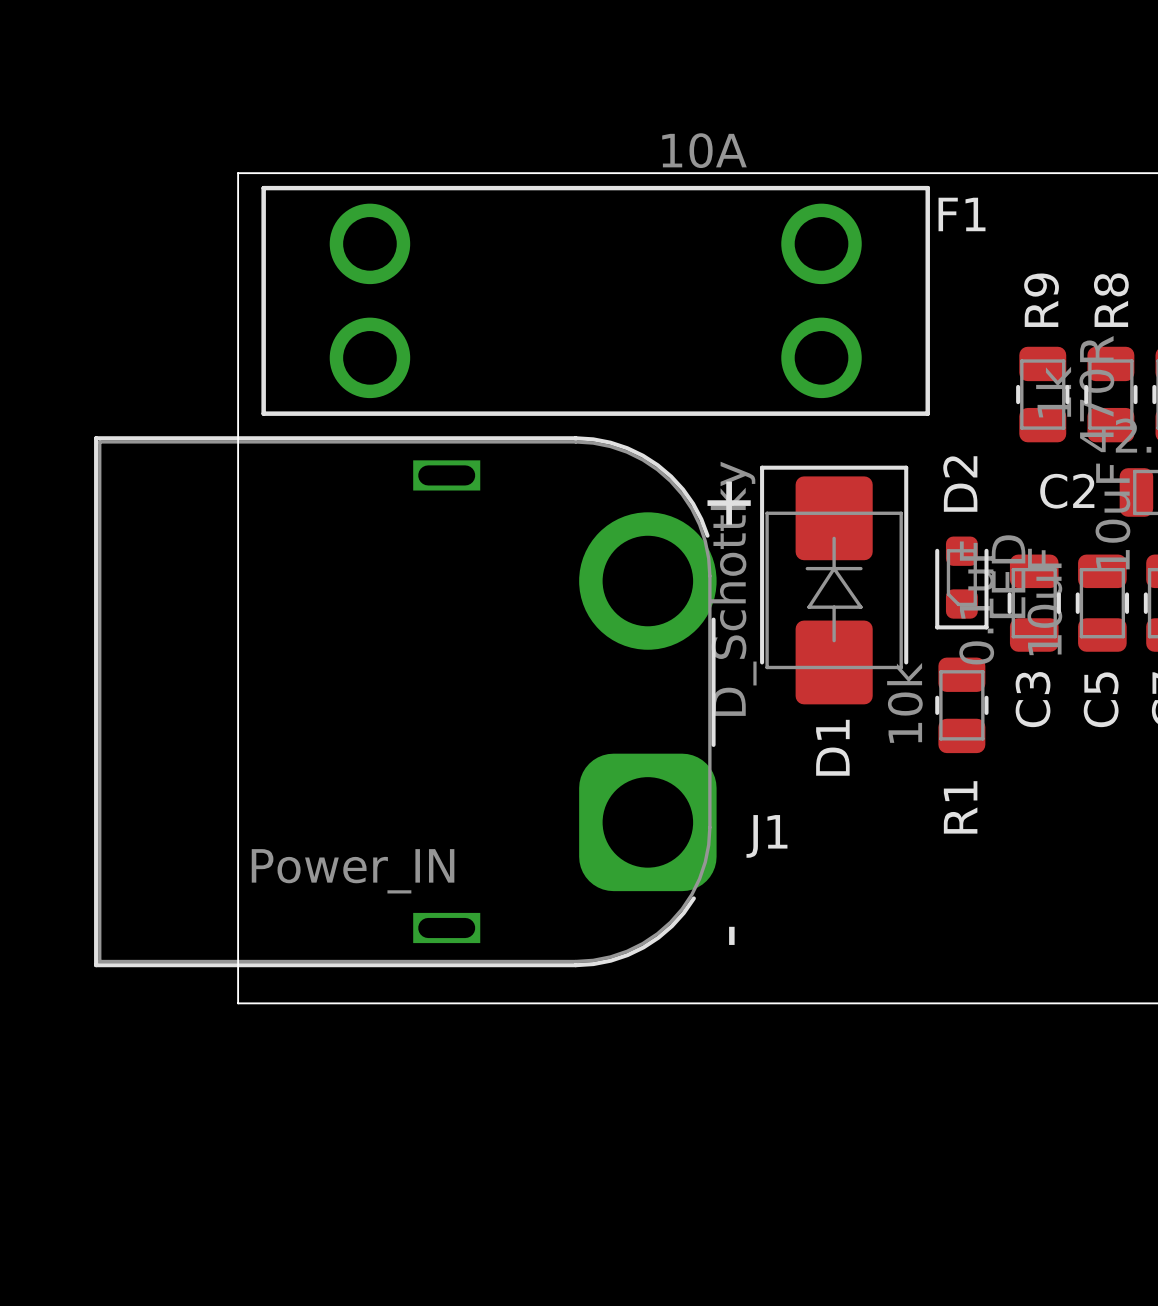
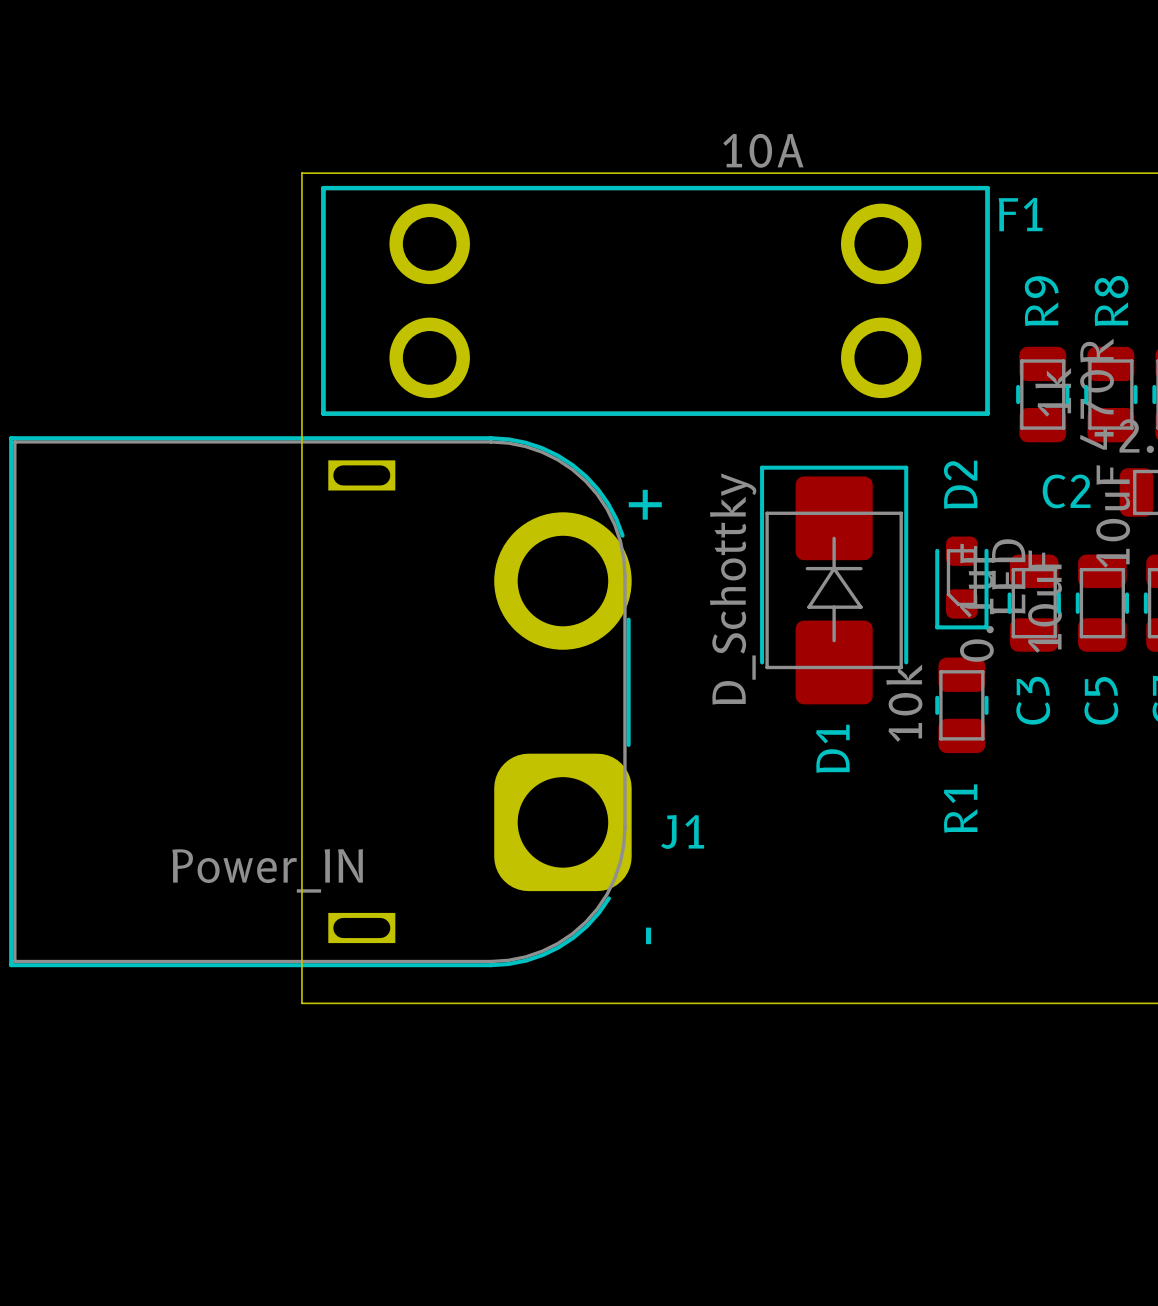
board edge: (301, 173) (238, 173) (238, 1003) (301, 1003) -> (301, 173) (301, 1003)
F1 position: (595, 300) -> (655, 300)
J1 position: (405, 701) -> (320, 701)

